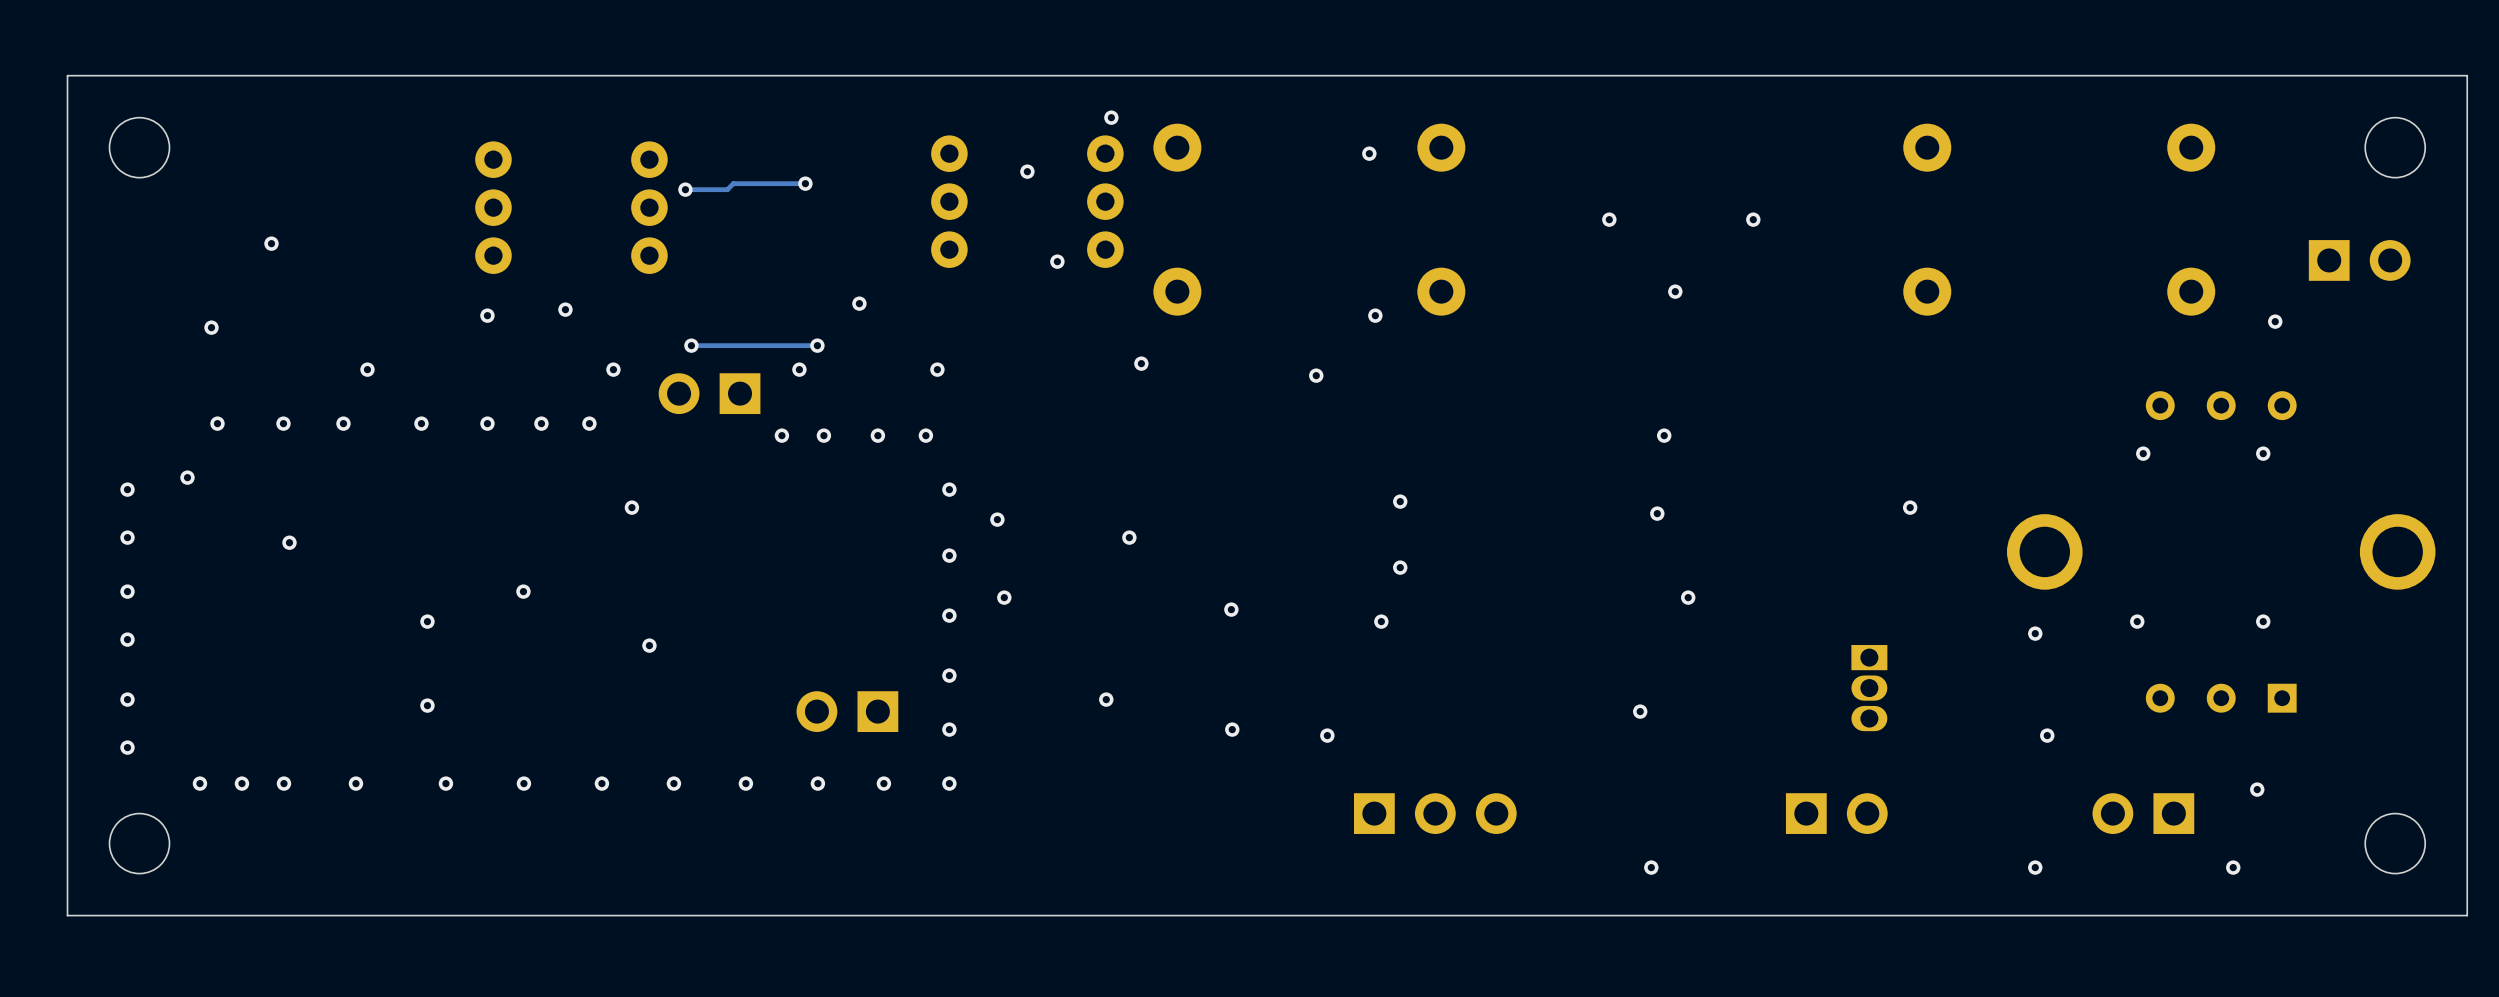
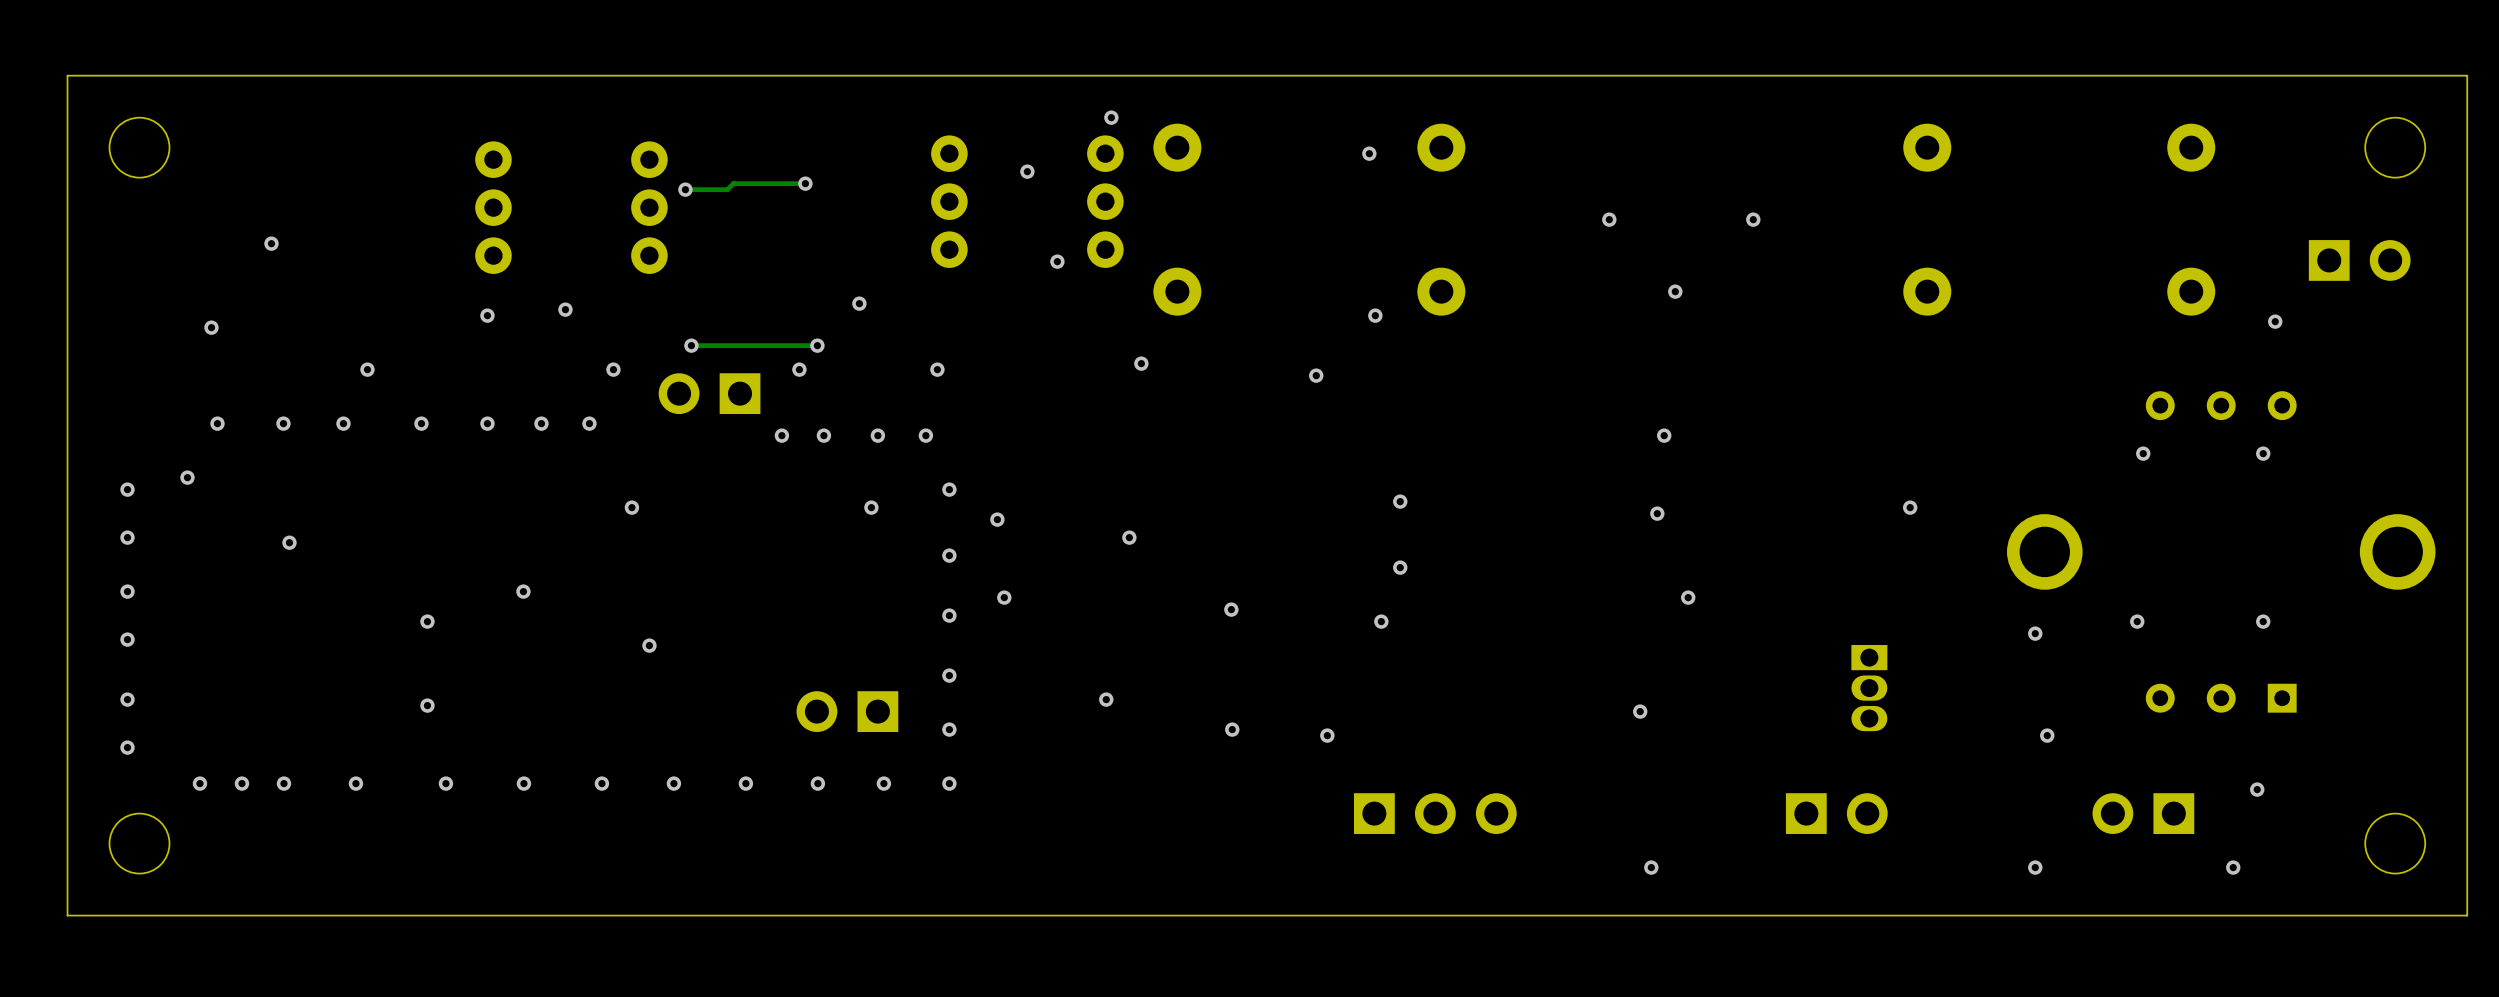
via: none -> (871, 507)

